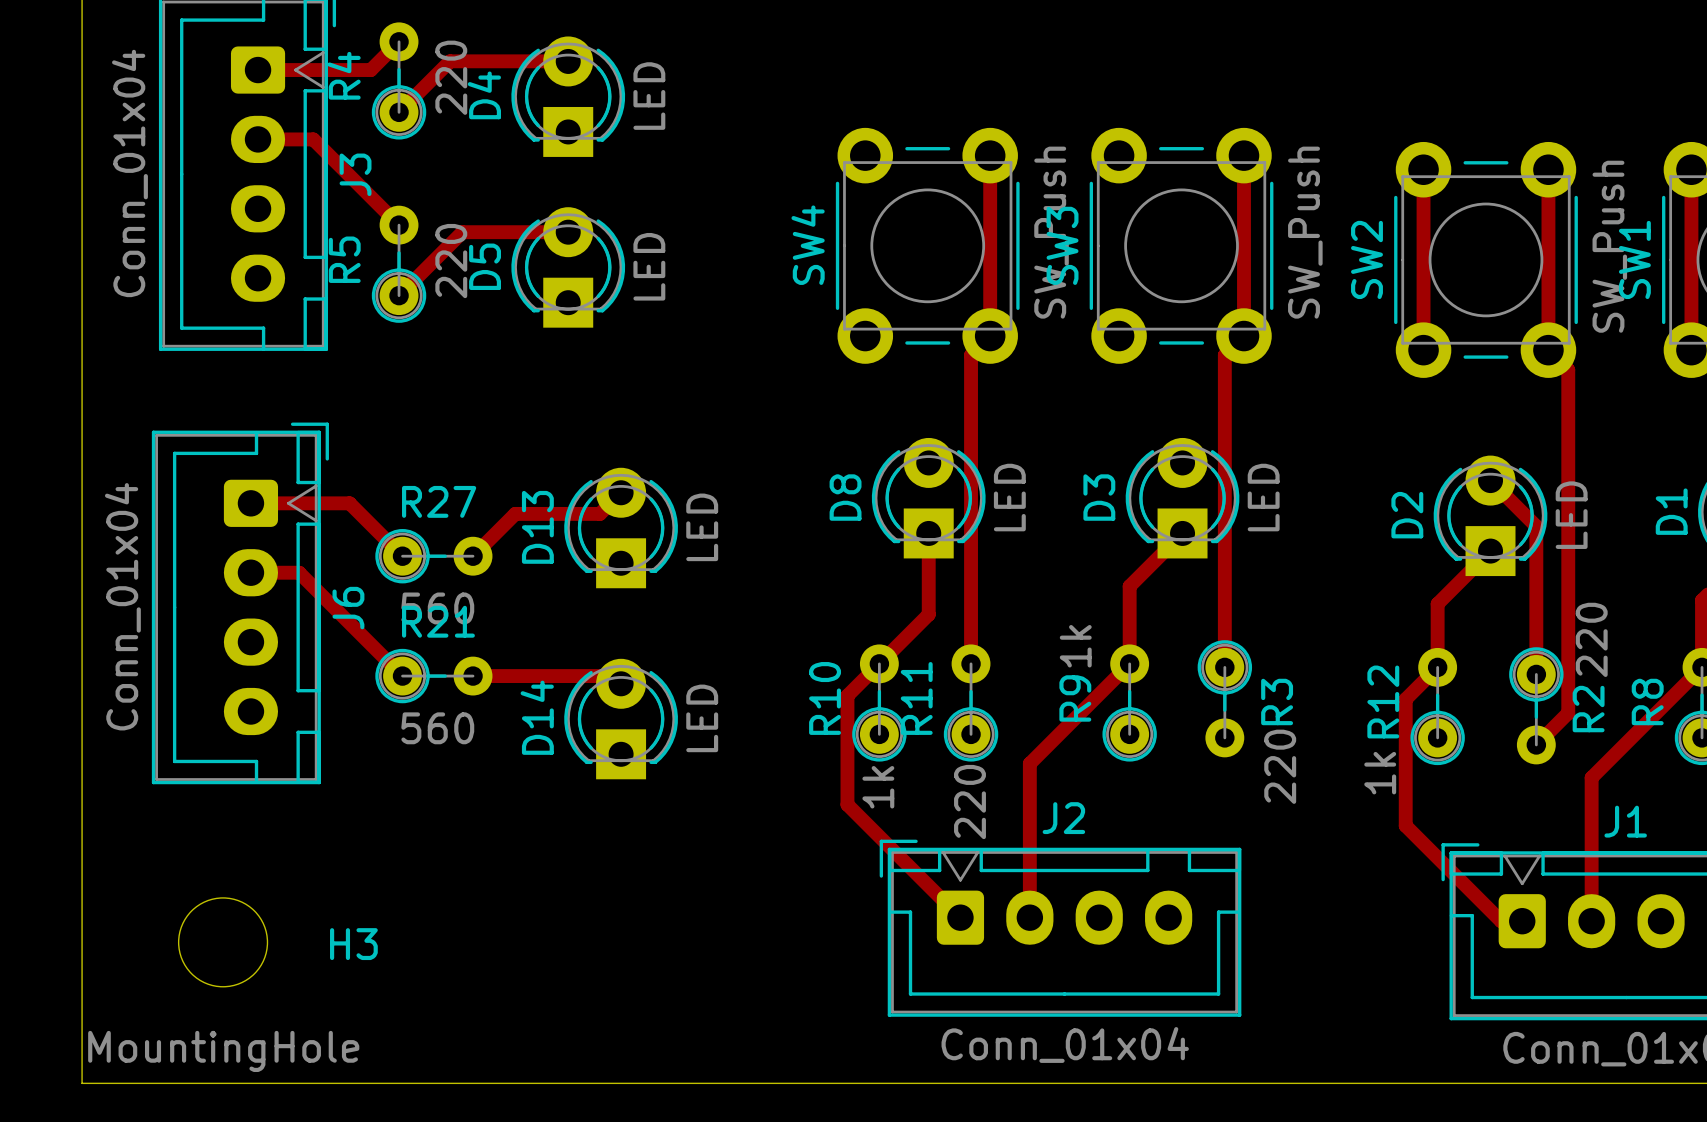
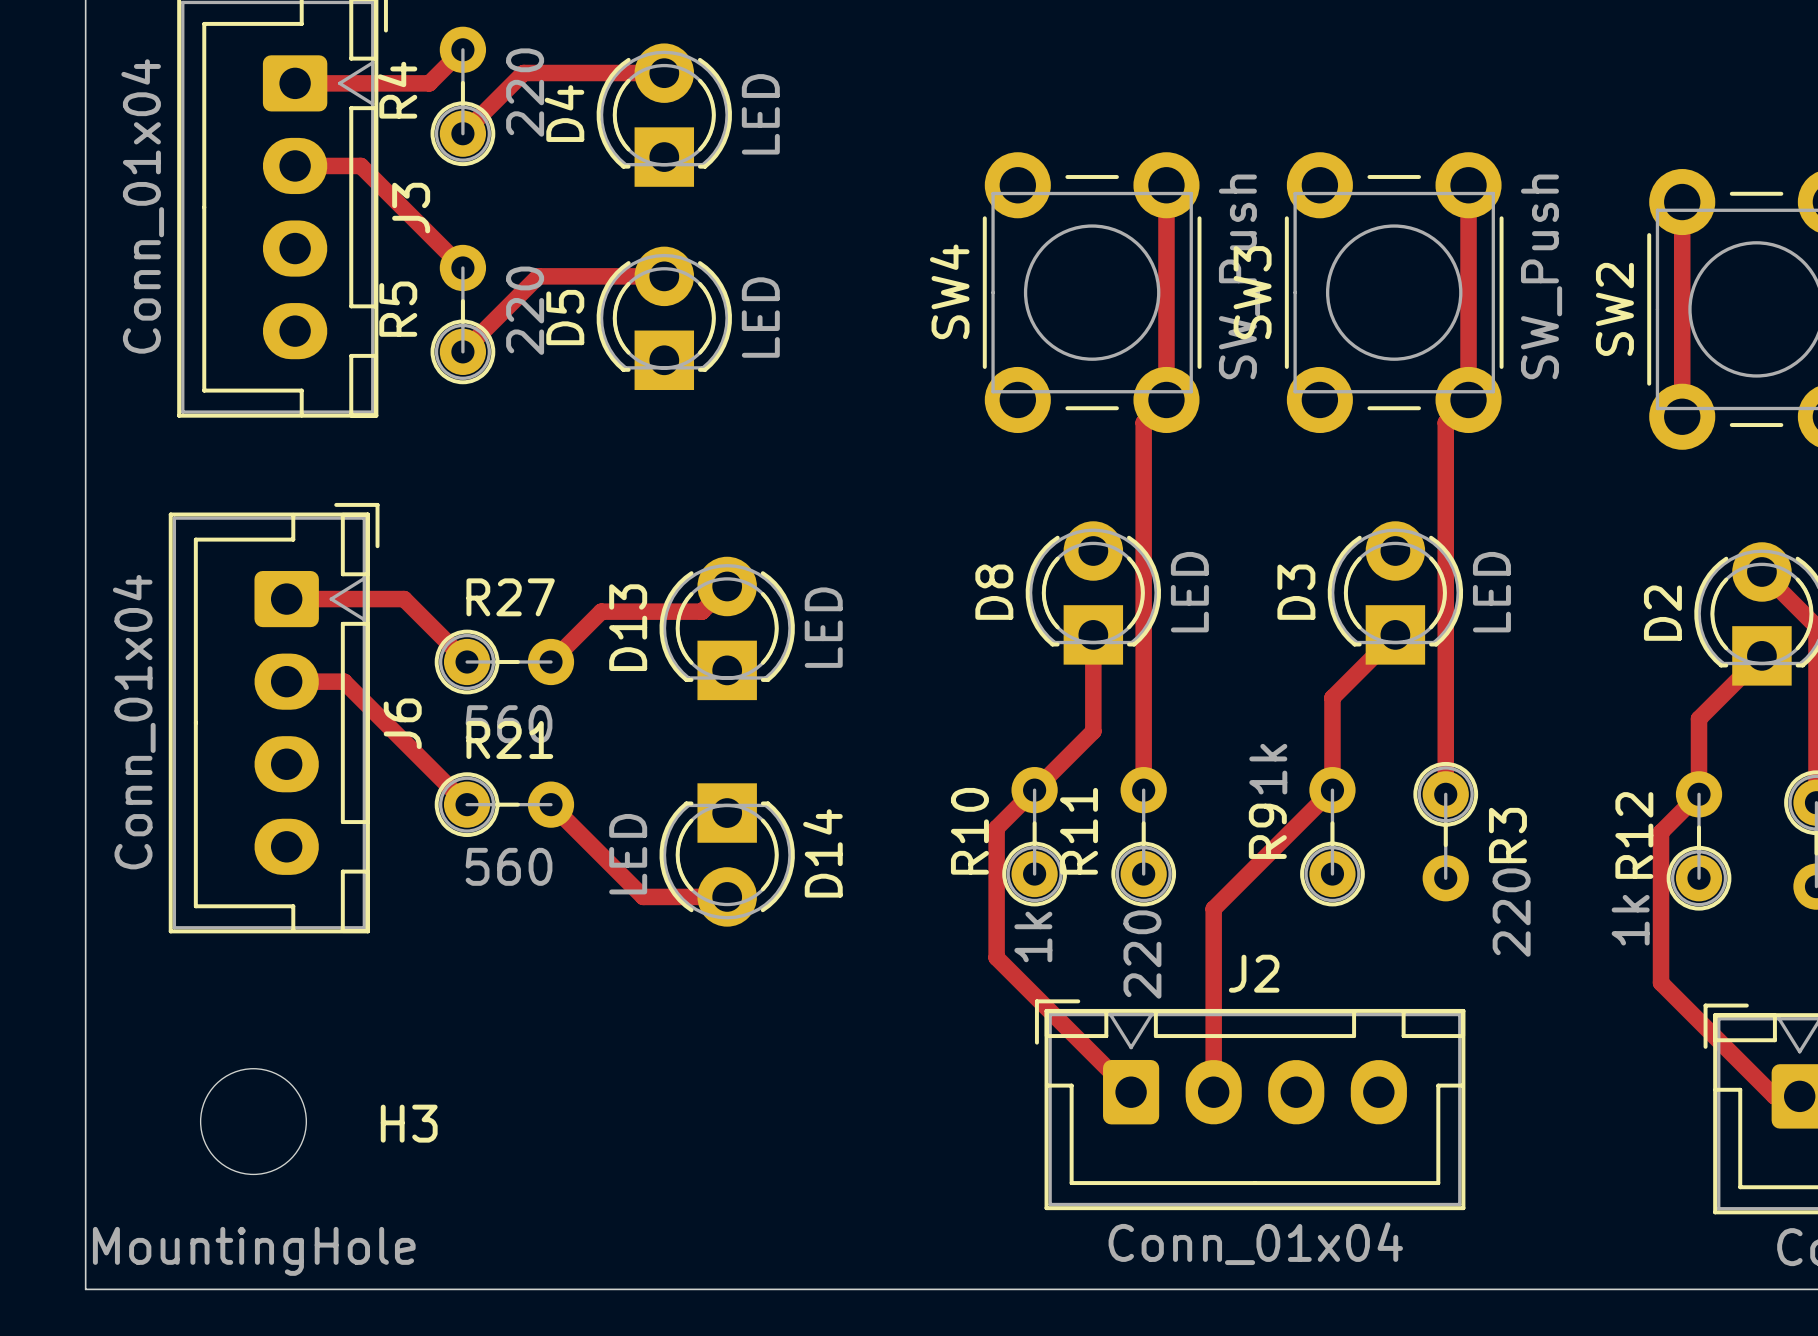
track: (473, 676) (613, 676) (621, 683) -> (550, 804) (643, 896) (727, 896)
D14 rotation: 0° (621, 719) -> 180° (727, 854)

